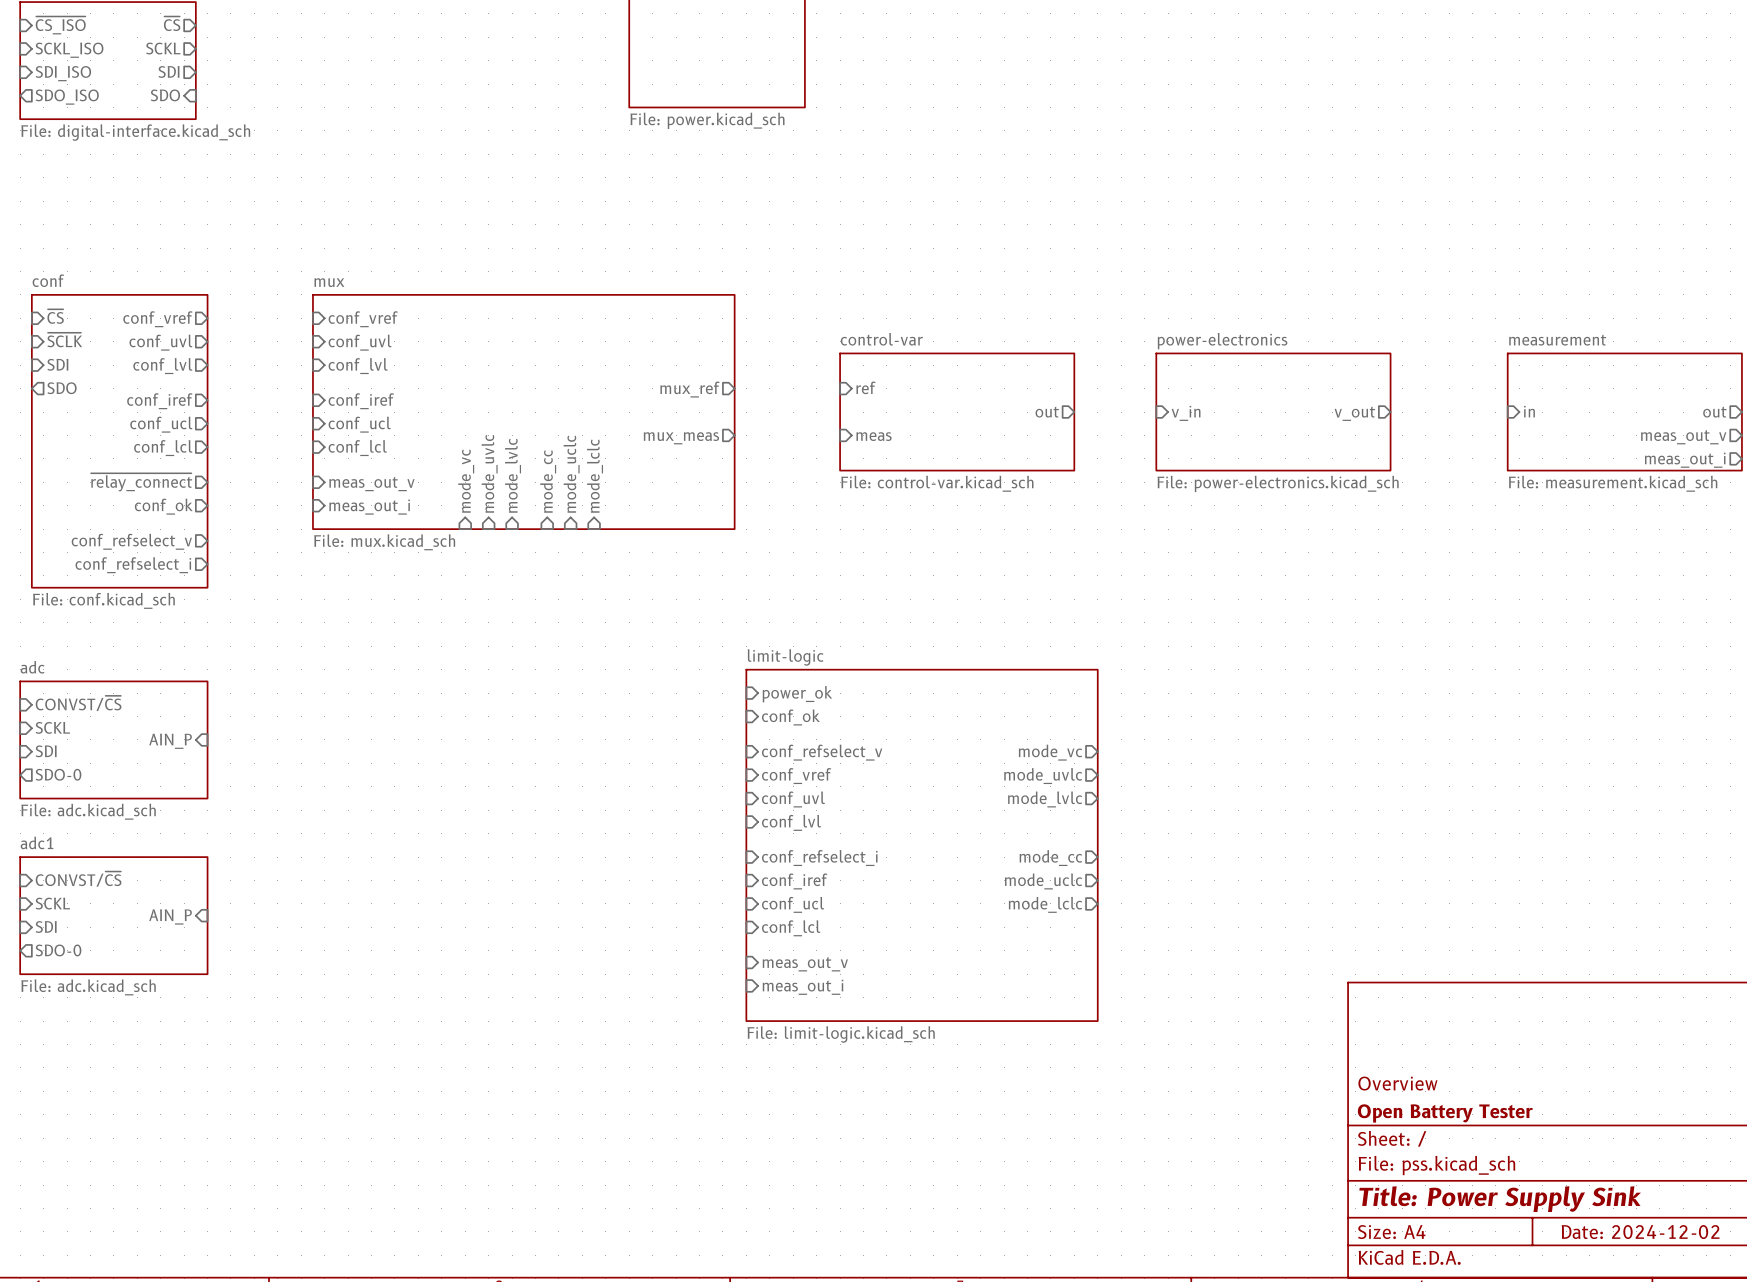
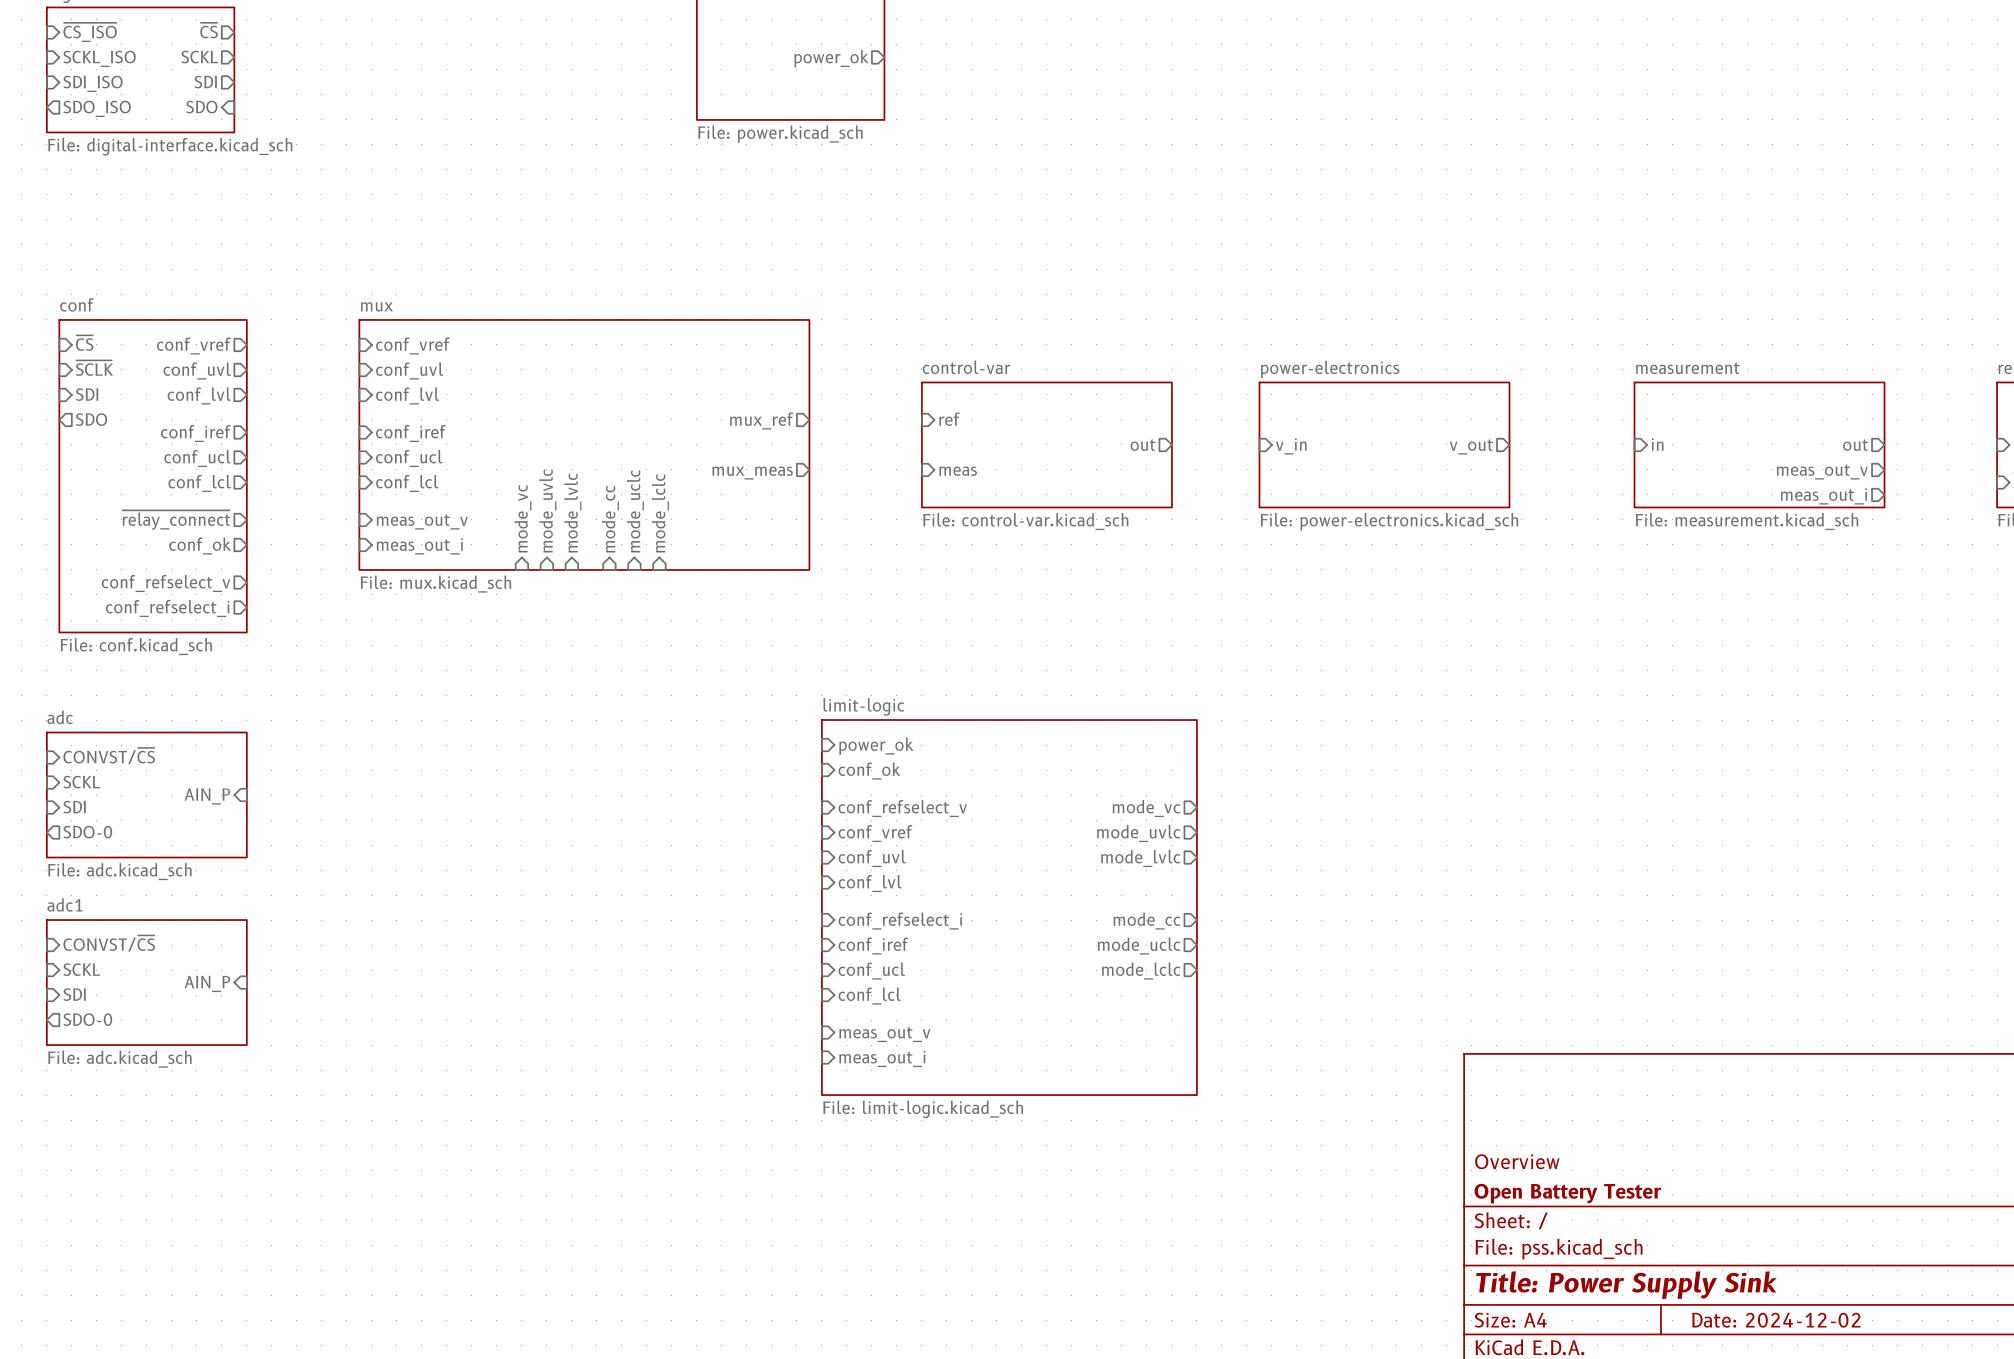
sheet pin: none -> power_ok (831, 58)

